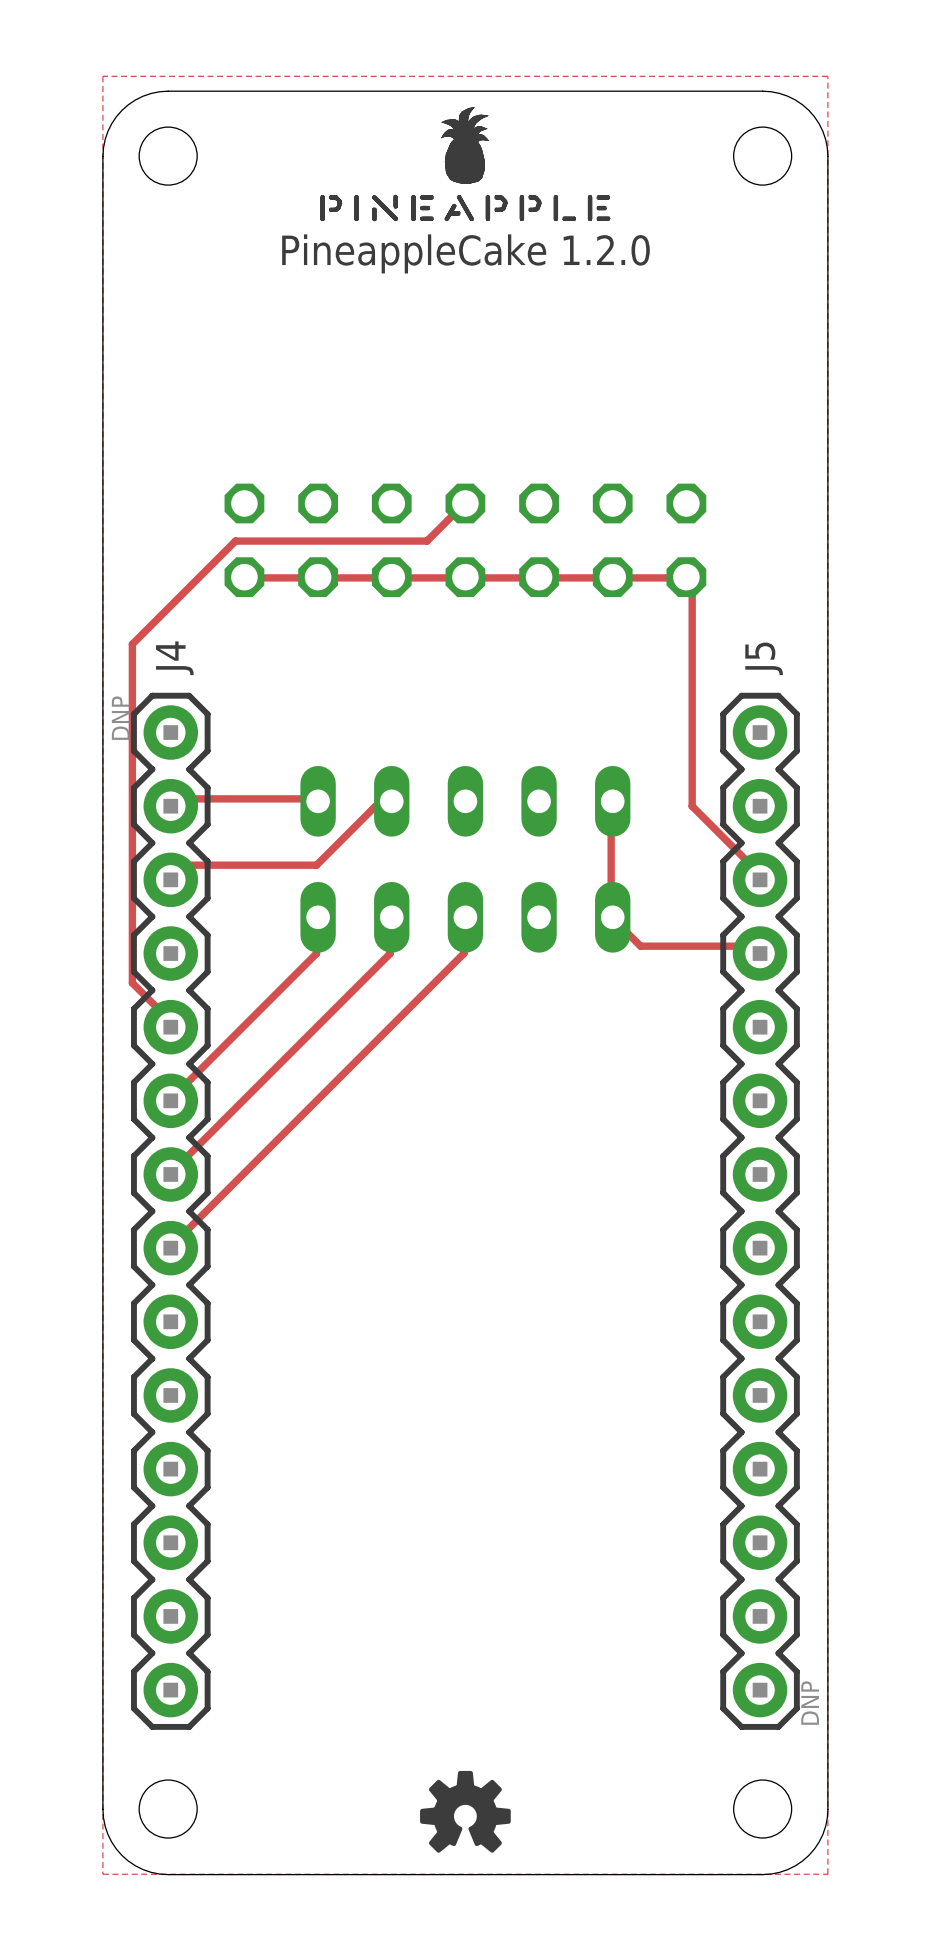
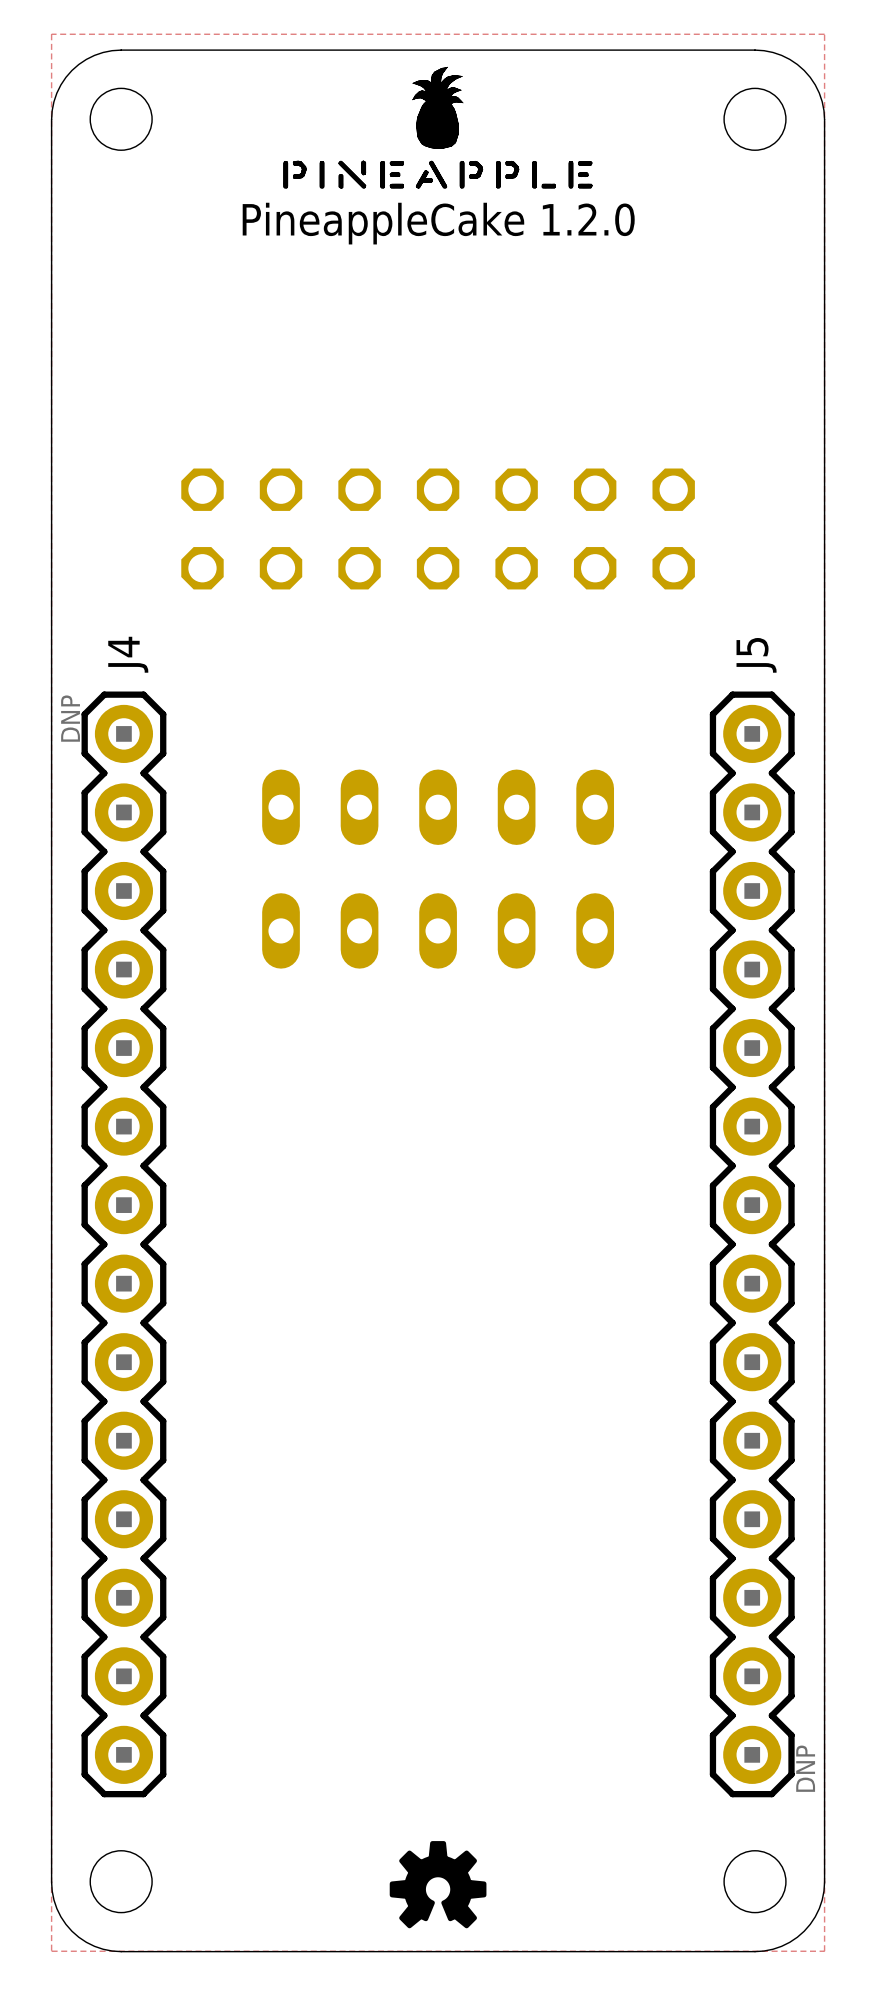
track: (465, 503) (427, 541) (235, 541) (132, 644) (132, 983) (169, 1019) (170, 1027) -> none
track: (244, 577) (692, 577) (692, 806) (758, 872) (760, 879) -> none
track: (318, 801) (316, 798) (176, 798) (170, 806) -> none
track: (391, 801) (390, 806) (375, 806) (316, 865) (183, 865) (170, 879) -> none
track: (612, 801) (611, 916) (640, 946) (758, 946) (760, 953) -> none
track: (318, 917) (316, 953) (170, 1100) -> none
track: (391, 917) (390, 953) (170, 1174) -> none
track: (465, 917) (463, 953) (170, 1248) -> none

